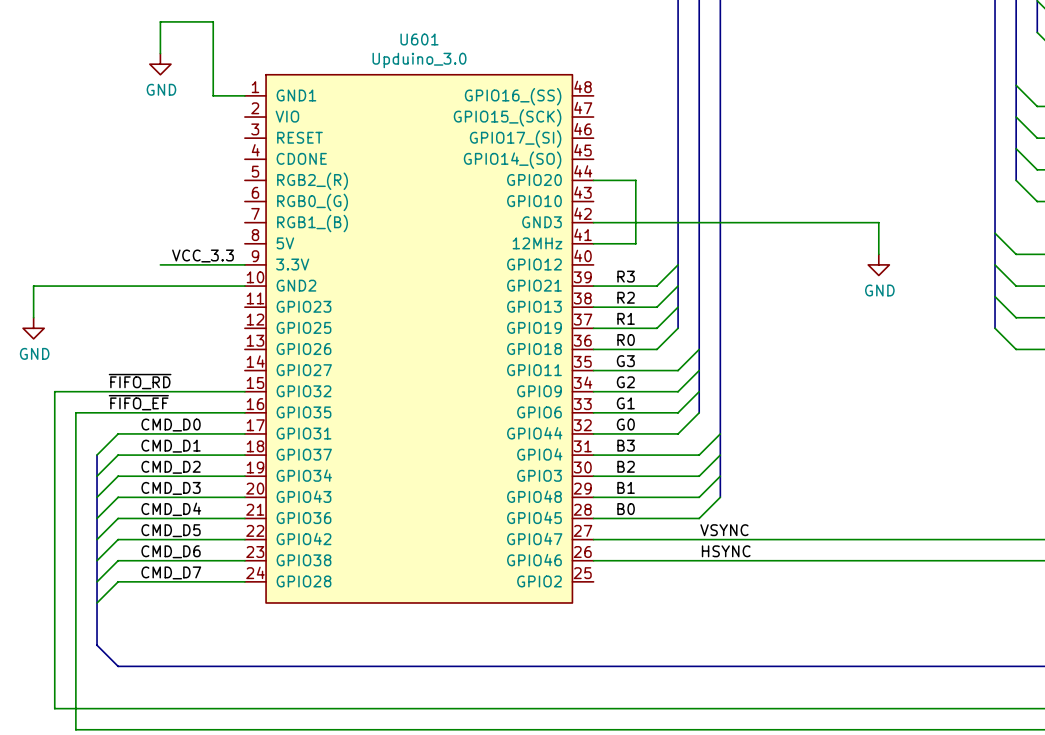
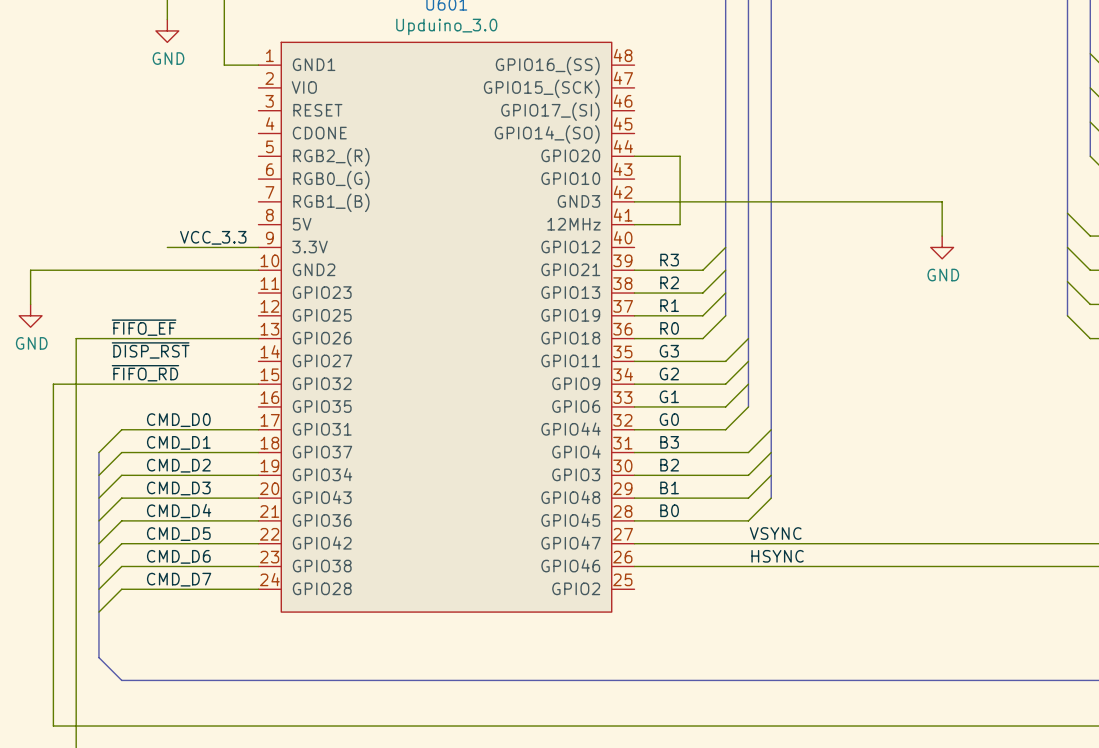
label: none -> ~{DISP_RST} (150, 350)
label position: ~{FIFO_EF} (138, 402) -> ~{FIFO_EF} (144, 327)
wire: (75, 412) (244, 412) -> (76, 406) (76, 338) (258, 338)

